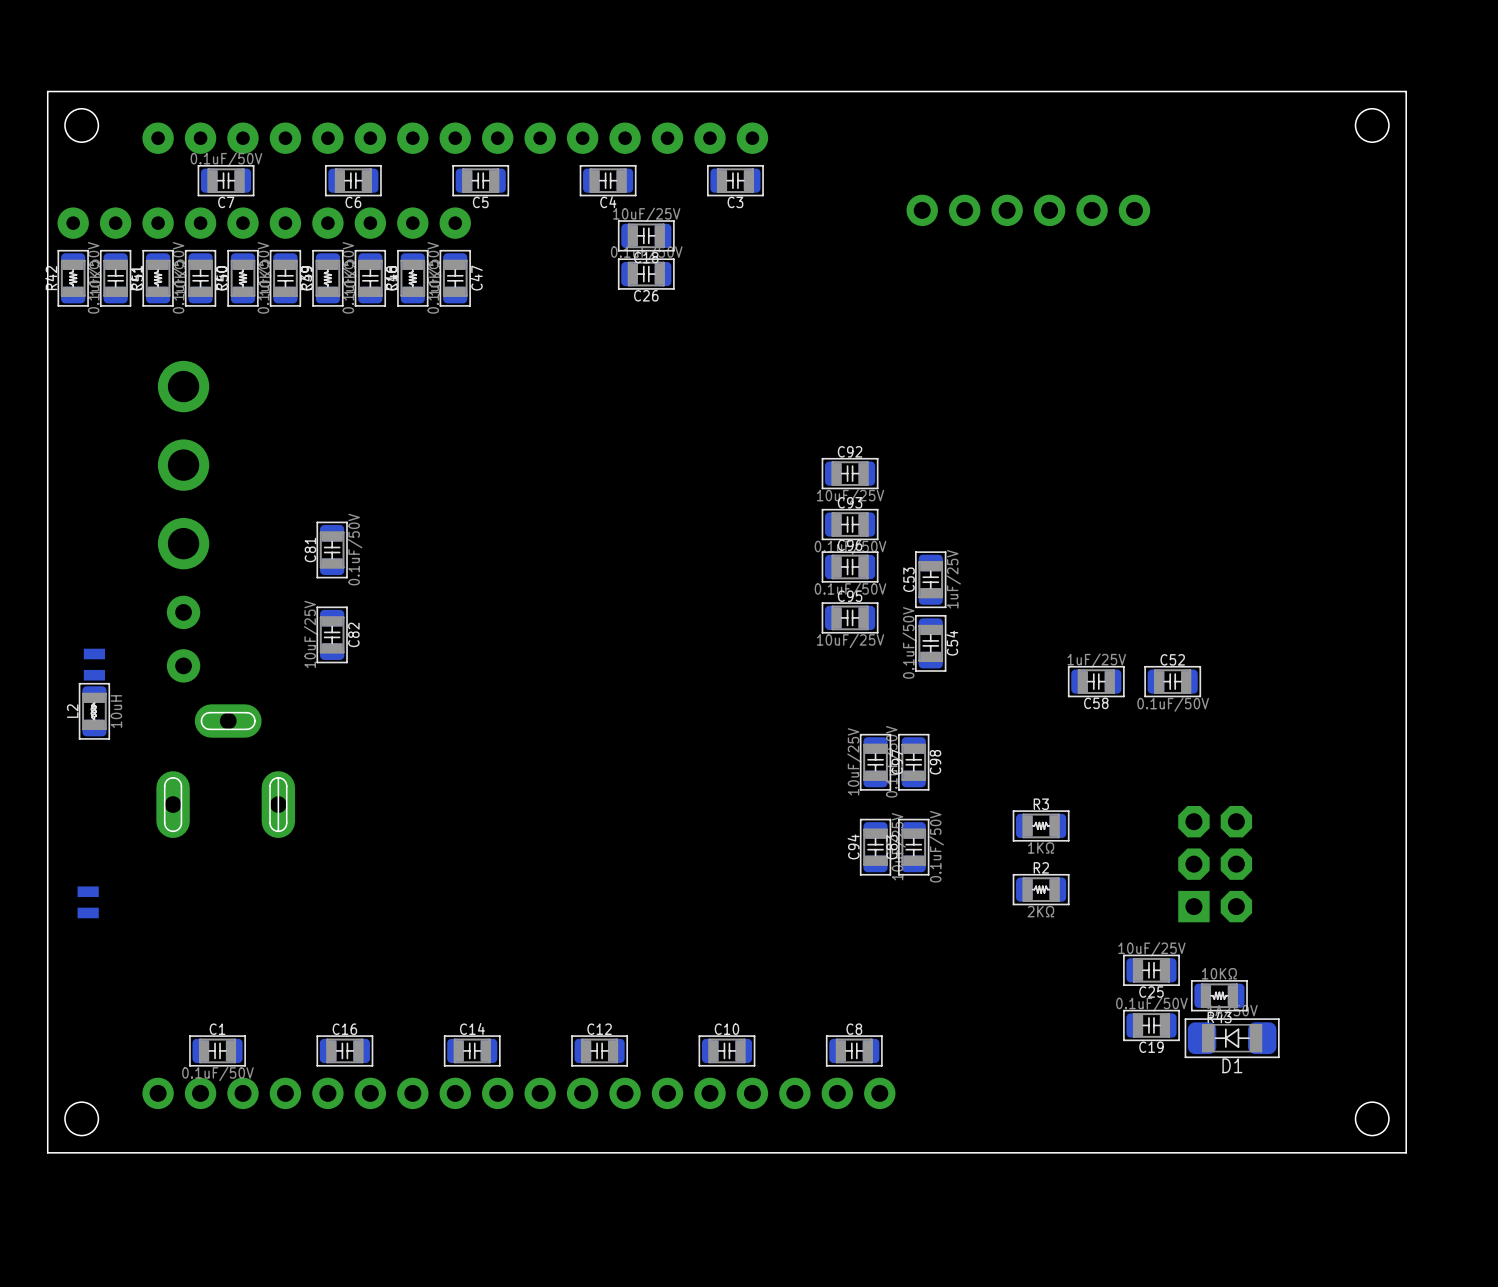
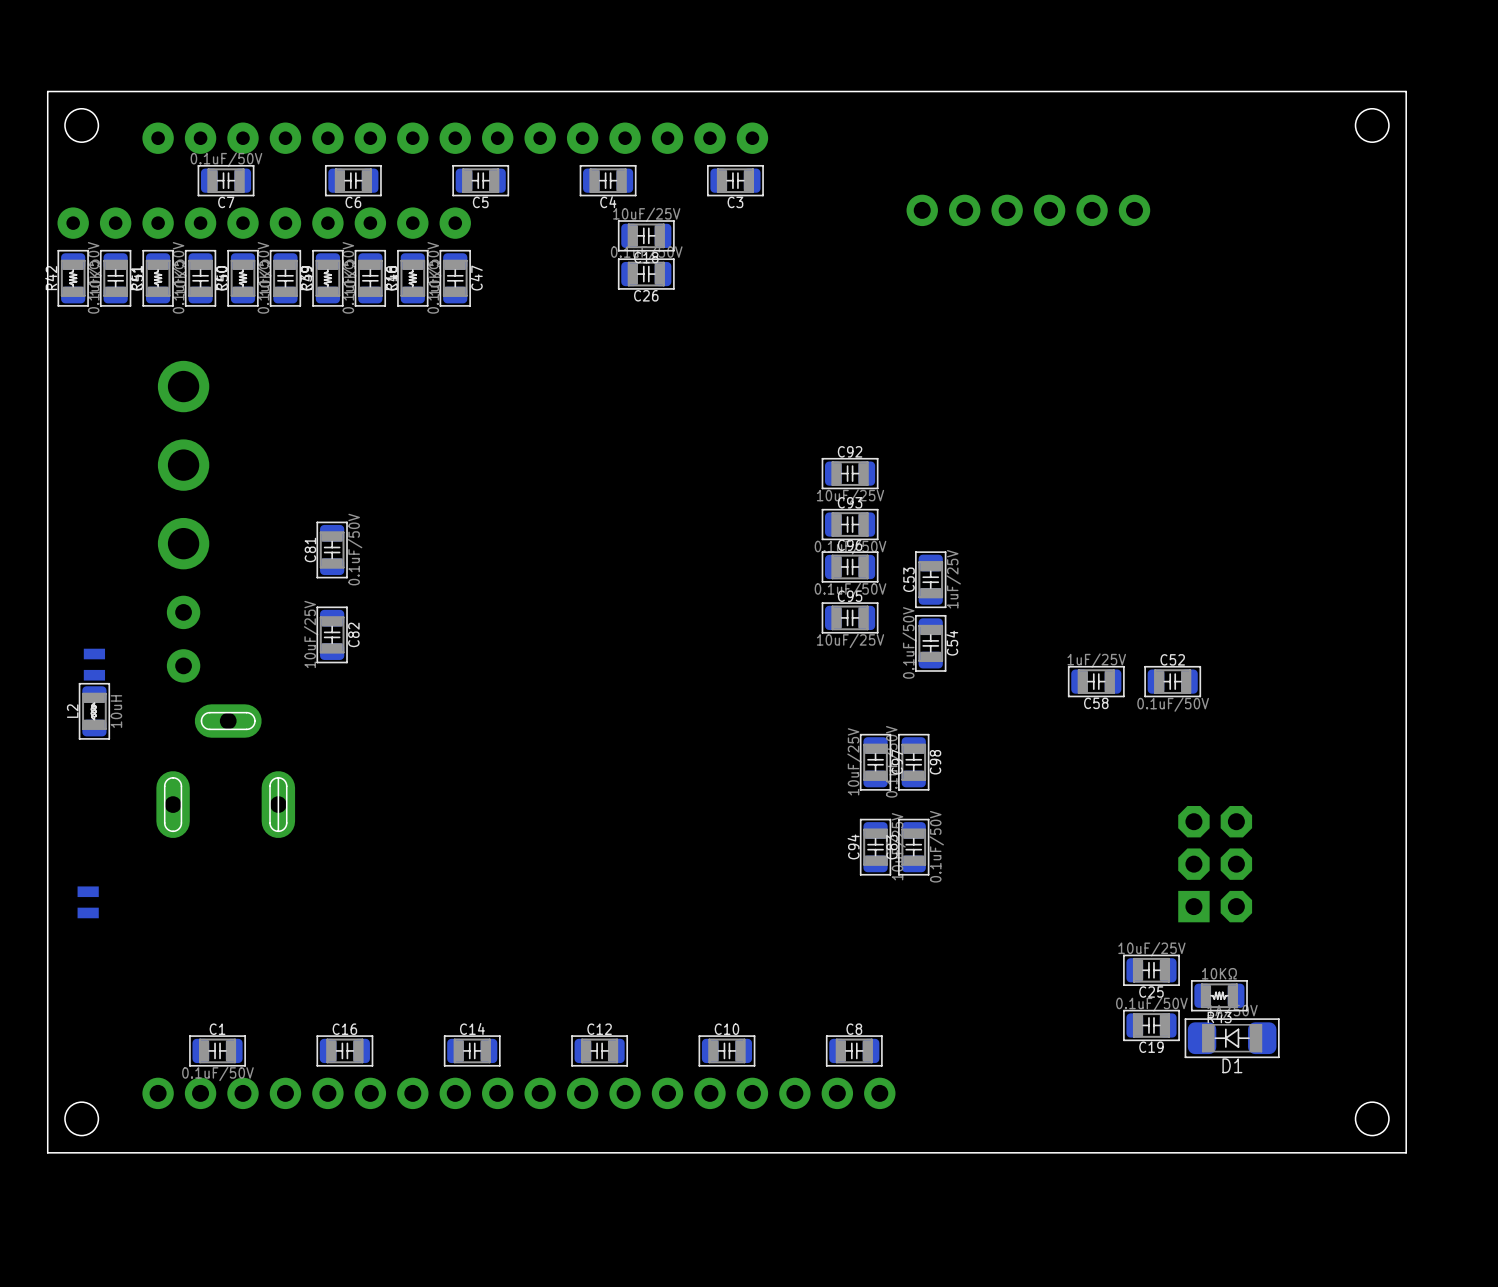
R3: 1KΩ (1041, 825) -> none
R2: 2KΩ (1041, 889) -> none

